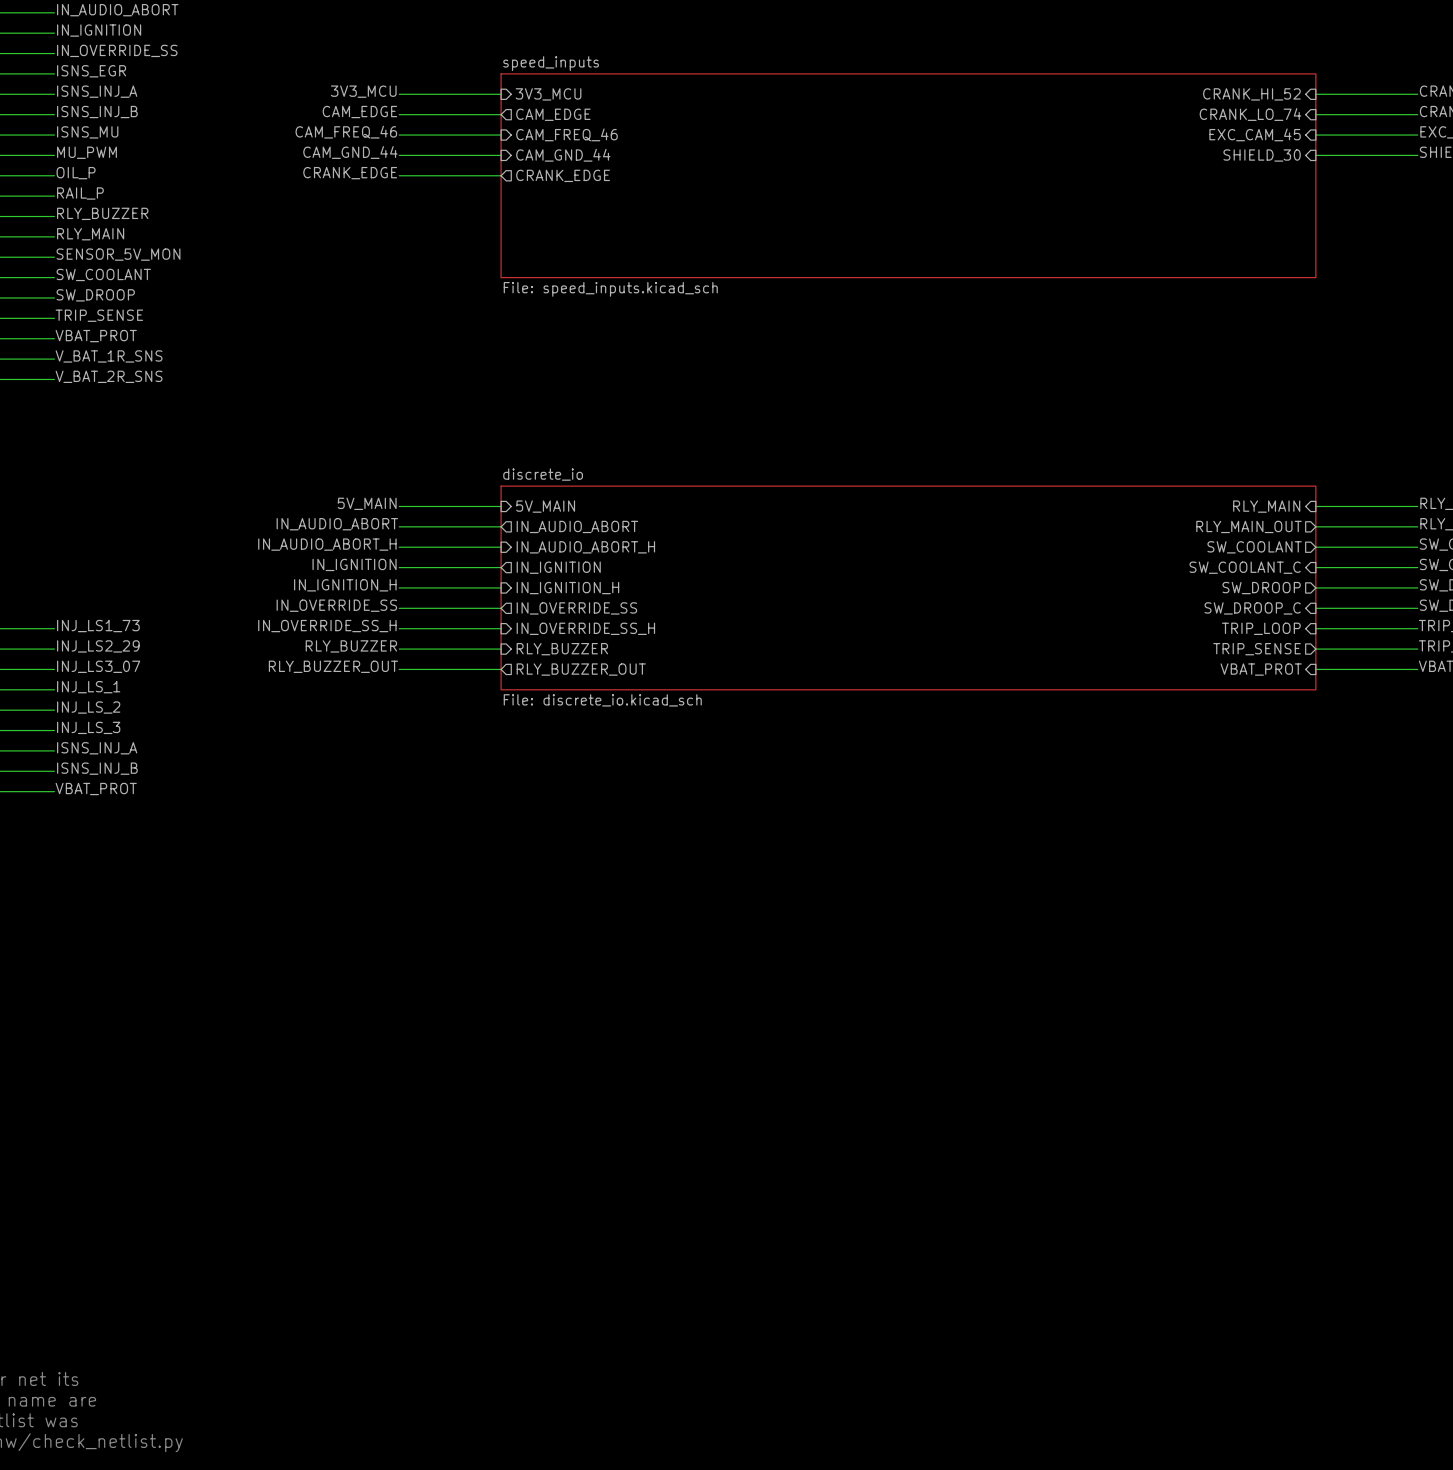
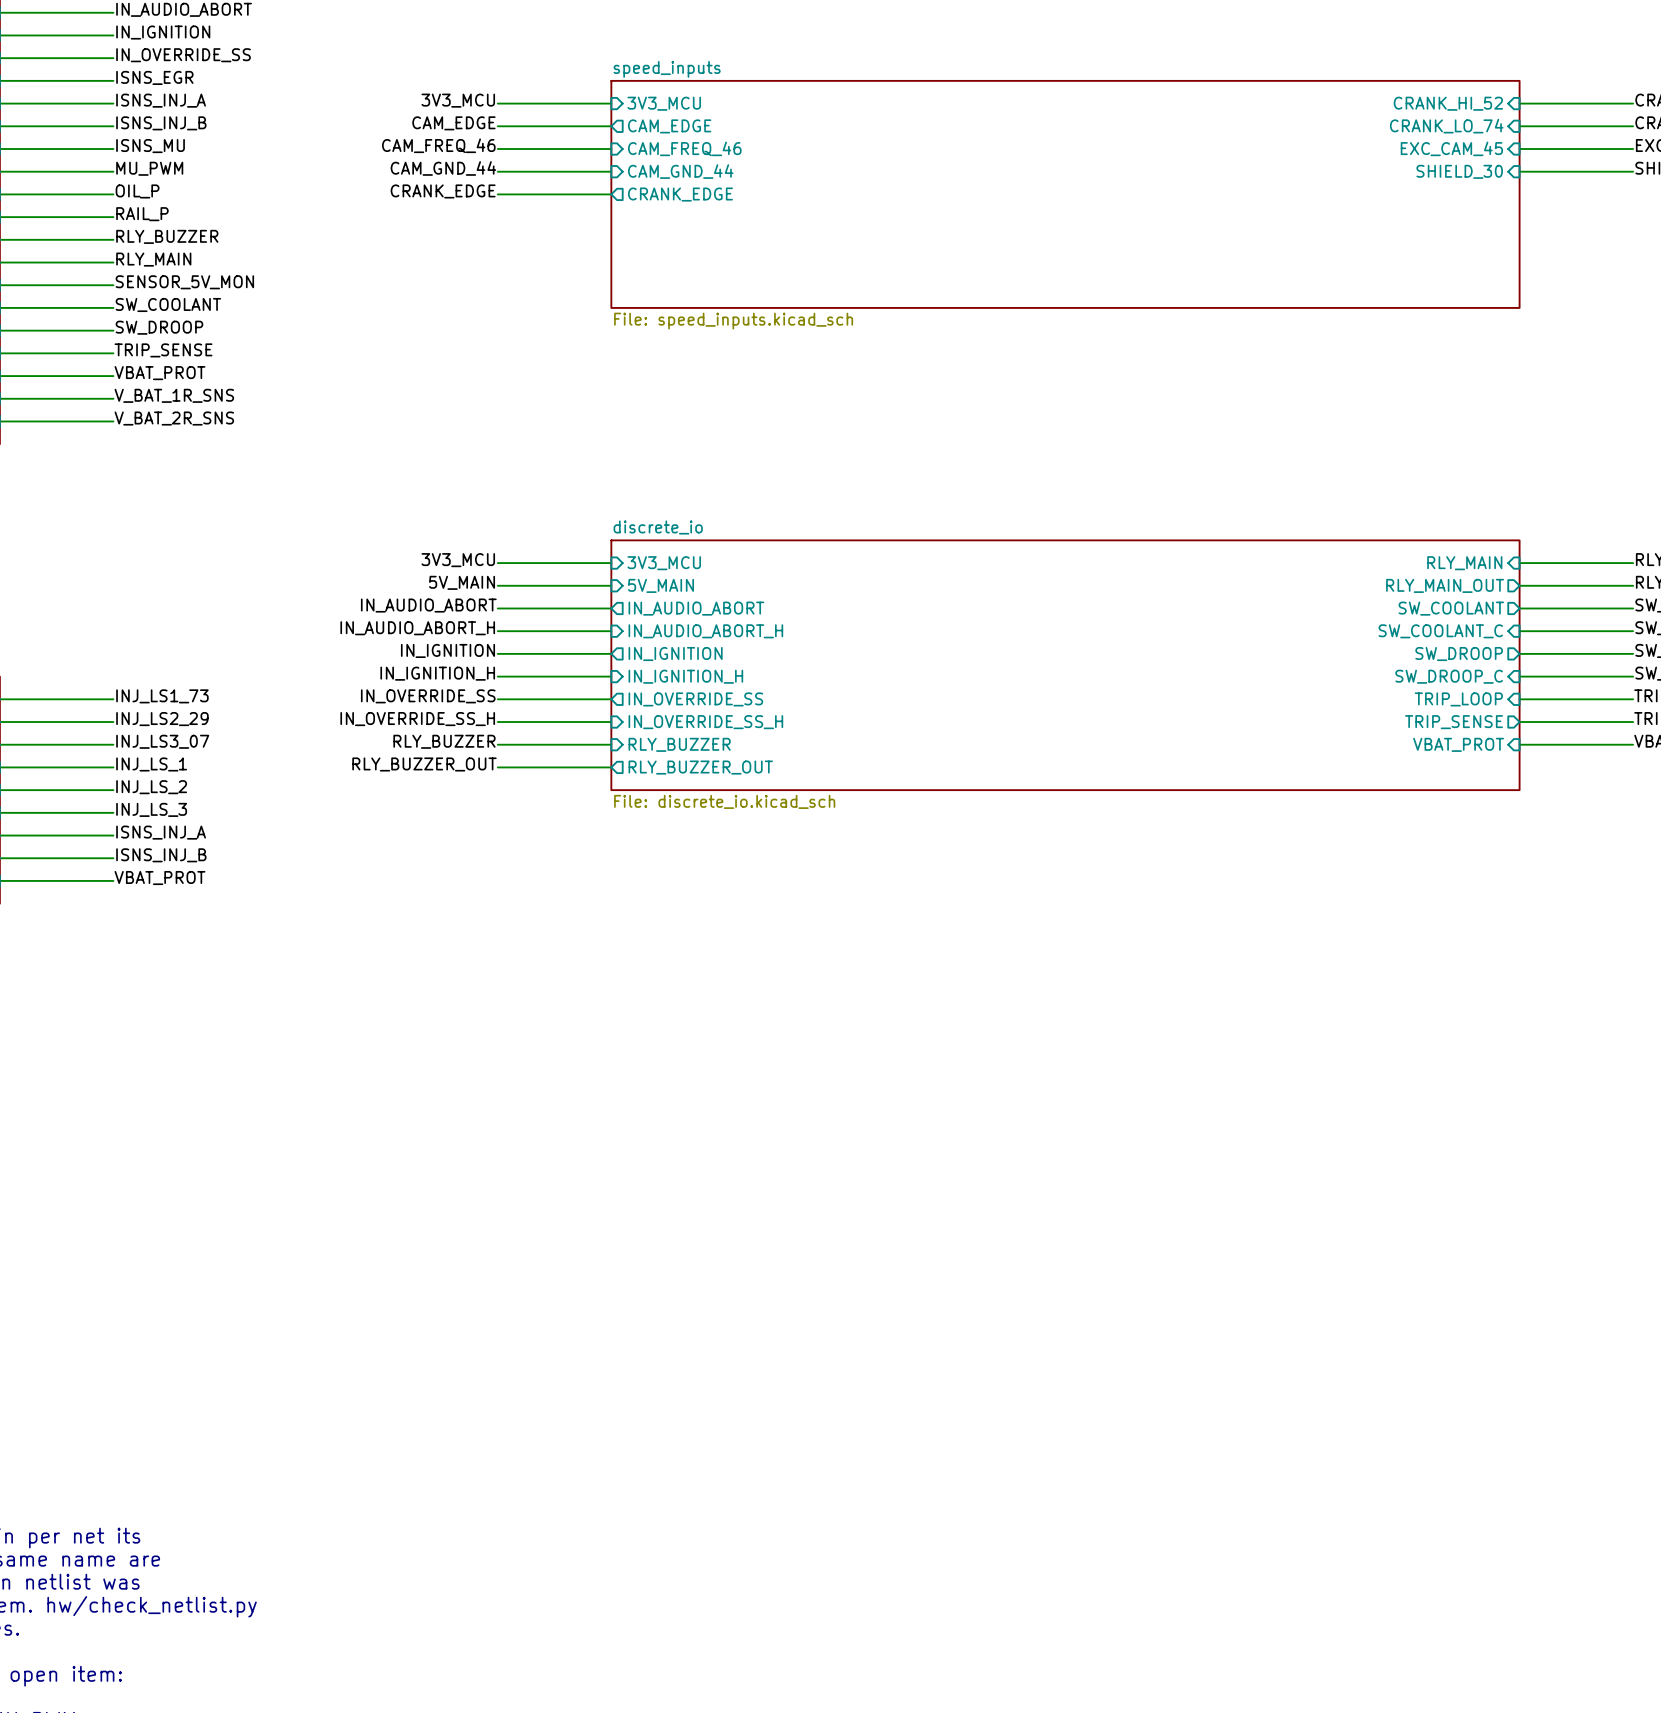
label: 5V_MAIN (367, 503) -> 3V3_MCU (458, 560)
sheet pin: 5V_MAIN (545, 506) -> 3V3_MCU (664, 563)
label: IN_AUDIO_ABORT (337, 524) -> 5V_MAIN (462, 582)
sheet pin shape: output (577, 526) -> input (660, 585)
sheet pin: IN_AUDIO_ABORT (577, 526) -> 5V_MAIN (660, 585)
label: IN_AUDIO_ABORT_H (327, 544) -> IN_AUDIO_ABORT (428, 605)
sheet pin shape: input (585, 547) -> output (696, 608)
sheet pin: IN_AUDIO_ABORT_H (585, 547) -> IN_AUDIO_ABORT (696, 608)
label: IN_IGNITION (354, 564) -> IN_AUDIO_ABORT_H (417, 628)
sheet pin shape: output (558, 567) -> input (705, 631)
sheet pin: IN_IGNITION (558, 567) -> IN_AUDIO_ABORT_H (705, 631)
label: IN_IGNITION_H (345, 585) -> IN_IGNITION (447, 650)
sheet discrete_io: File: discrete_io.kicad_sch (908, 587) -> none
sheet pin shape: input (567, 588) -> output (675, 654)
sheet pin: IN_IGNITION_H (567, 588) -> IN_IGNITION (675, 654)
sheet discrete_io: none -> File: discrete_io.kicad_sch (1065, 665)
label: IN_OVERRIDE_SS (336, 605) -> IN_IGNITION_H (437, 673)
sheet pin shape: output (576, 608) -> input (685, 676)
sheet pin: IN_OVERRIDE_SS (576, 608) -> IN_IGNITION_H (685, 676)
label: IN_OVERRIDE_SS_H (327, 626) -> IN_OVERRIDE_SS (428, 696)
sheet pin shape: input (585, 628) -> output (695, 699)
sheet pin: IN_OVERRIDE_SS_H (585, 628) -> IN_OVERRIDE_SS (695, 699)
label: RLY_BUZZER (351, 646) -> IN_OVERRIDE_SS_H (417, 719)
sheet pin: RLY_BUZZER (562, 649) -> IN_OVERRIDE_SS_H (705, 722)
label: RLY_BUZZER_OUT (333, 666) -> RLY_BUZZER (444, 741)
sheet pin shape: output (581, 669) -> input (679, 744)
sheet pin: RLY_BUZZER_OUT (581, 669) -> RLY_BUZZER (679, 744)
label: none -> RLY_BUZZER_OUT (424, 764)
wire: none -> (497, 767) (611, 767)
sheet pin: none -> RLY_BUZZER_OUT (700, 767)

